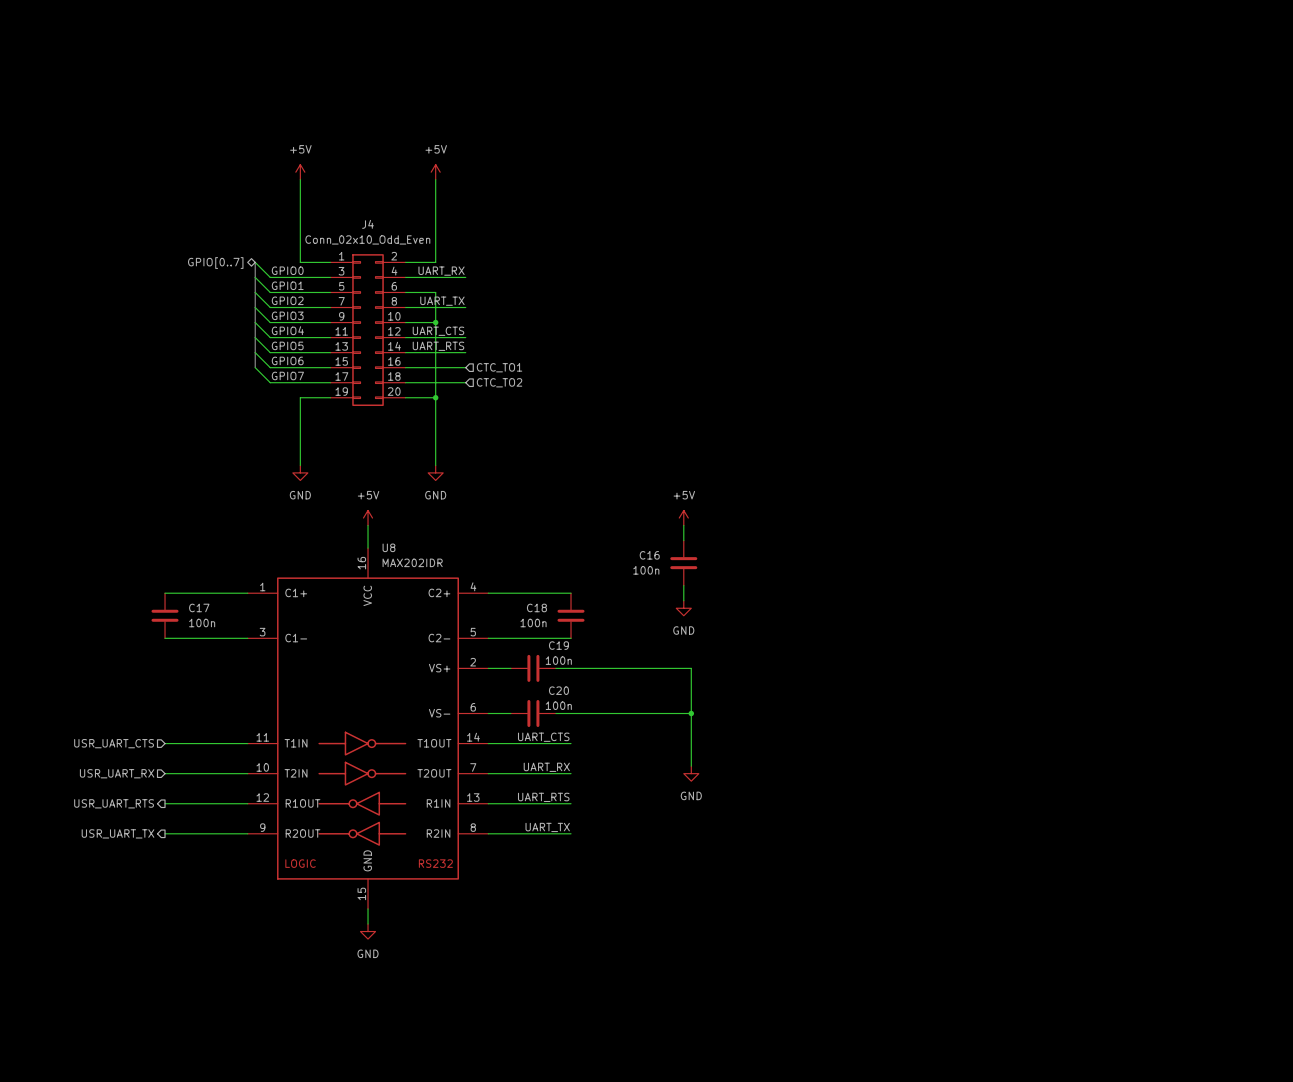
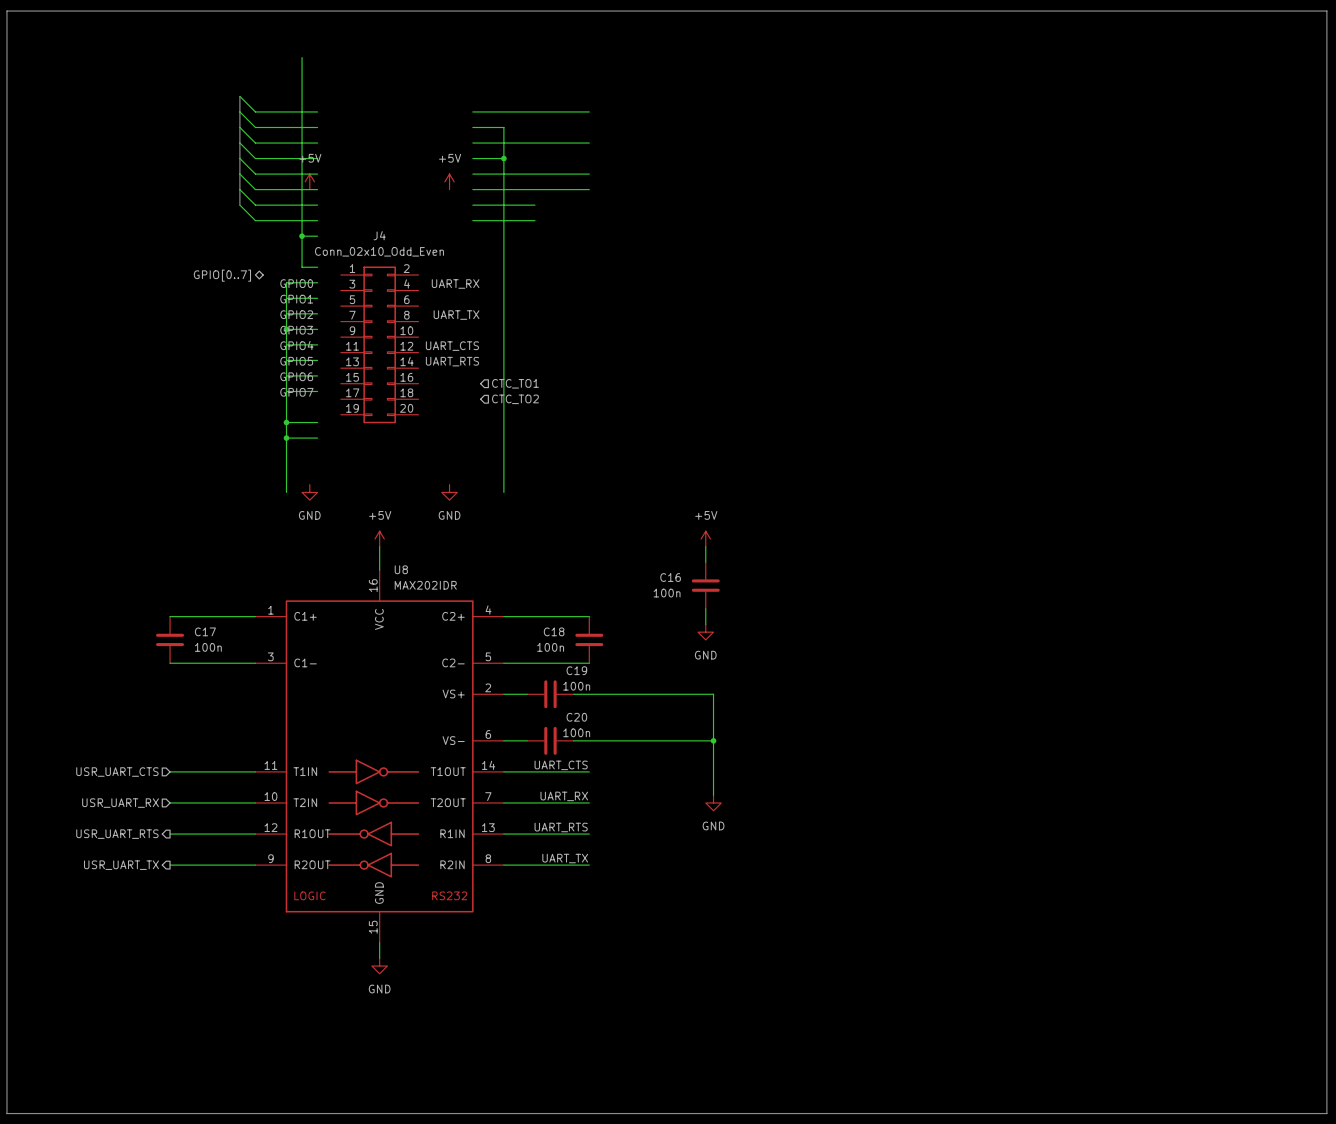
line: none -> (6, 11) (1326, 11) (1326, 1113) (6, 1113) (6, 11)
wire: none -> (302, 57) (302, 267) (317, 267)
wire: none -> (239, 96) (255, 111) (317, 111)
bus: none -> (239, 96) (239, 205)
wire: none -> (239, 111) (255, 127) (317, 127)
wire: none -> (472, 111) (589, 111)
wire: none -> (472, 127) (503, 127) (503, 492)
wire: none -> (472, 143) (589, 143)
wire: none -> (472, 158) (503, 158)
junction: none -> (503, 158)
wire: none -> (472, 174) (589, 174)
wire: (300, 179) (300, 262) (330, 262) -> none
wire: (435, 179) (435, 262) (405, 262) -> none
wire: none -> (472, 189) (589, 189)
wire: none -> (302, 236) (317, 236)
junction: none -> (302, 236)
wire: (255, 262) (270, 277) (330, 277) -> (239, 127) (255, 143) (317, 143)
bus: (255, 262) (255, 367) -> none
wire: none -> (317, 282) (286, 282) (286, 492)
wire: (255, 277) (270, 292) (330, 292) -> (239, 143) (255, 158) (317, 158)
wire: (405, 277) (465, 277) -> (472, 220) (534, 220)
wire: none -> (286, 298) (317, 298)
wire: (255, 292) (270, 307) (330, 307) -> (239, 158) (255, 174) (317, 174)
wire: (405, 292) (435, 292) (435, 465) -> none
wire: none -> (286, 313) (317, 313)
wire: (255, 307) (270, 322) (330, 322) -> (239, 174) (255, 189) (317, 189)
wire: (405, 307) (465, 307) -> (472, 205) (534, 205)
wire: none -> (286, 329) (317, 329)
junction: none -> (286, 329)
wire: (255, 322) (270, 337) (330, 337) -> (239, 189) (255, 205) (317, 205)
wire: (405, 322) (435, 322) -> (286, 344) (317, 344)
junction: (435, 322) -> none
wire: (255, 337) (270, 352) (330, 352) -> (239, 205) (255, 220) (317, 220)
wire: (405, 337) (465, 337) -> none
wire: none -> (286, 360) (317, 360)
wire: (255, 352) (270, 367) (330, 367) -> none
wire: (405, 352) (465, 352) -> none
wire: none -> (286, 375) (317, 375)
wire: (255, 367) (270, 382) (330, 382) -> none
wire: (405, 367) (465, 367) -> none
wire: none -> (286, 391) (317, 391)
wire: (405, 382) (465, 382) -> none
wire: (330, 397) (300, 397) (300, 465) -> none
wire: (405, 397) (435, 397) -> (286, 422) (317, 422)
junction: (435, 397) -> none
junction: none -> (286, 422)
wire: none -> (286, 438) (317, 438)
junction: none -> (286, 438)

